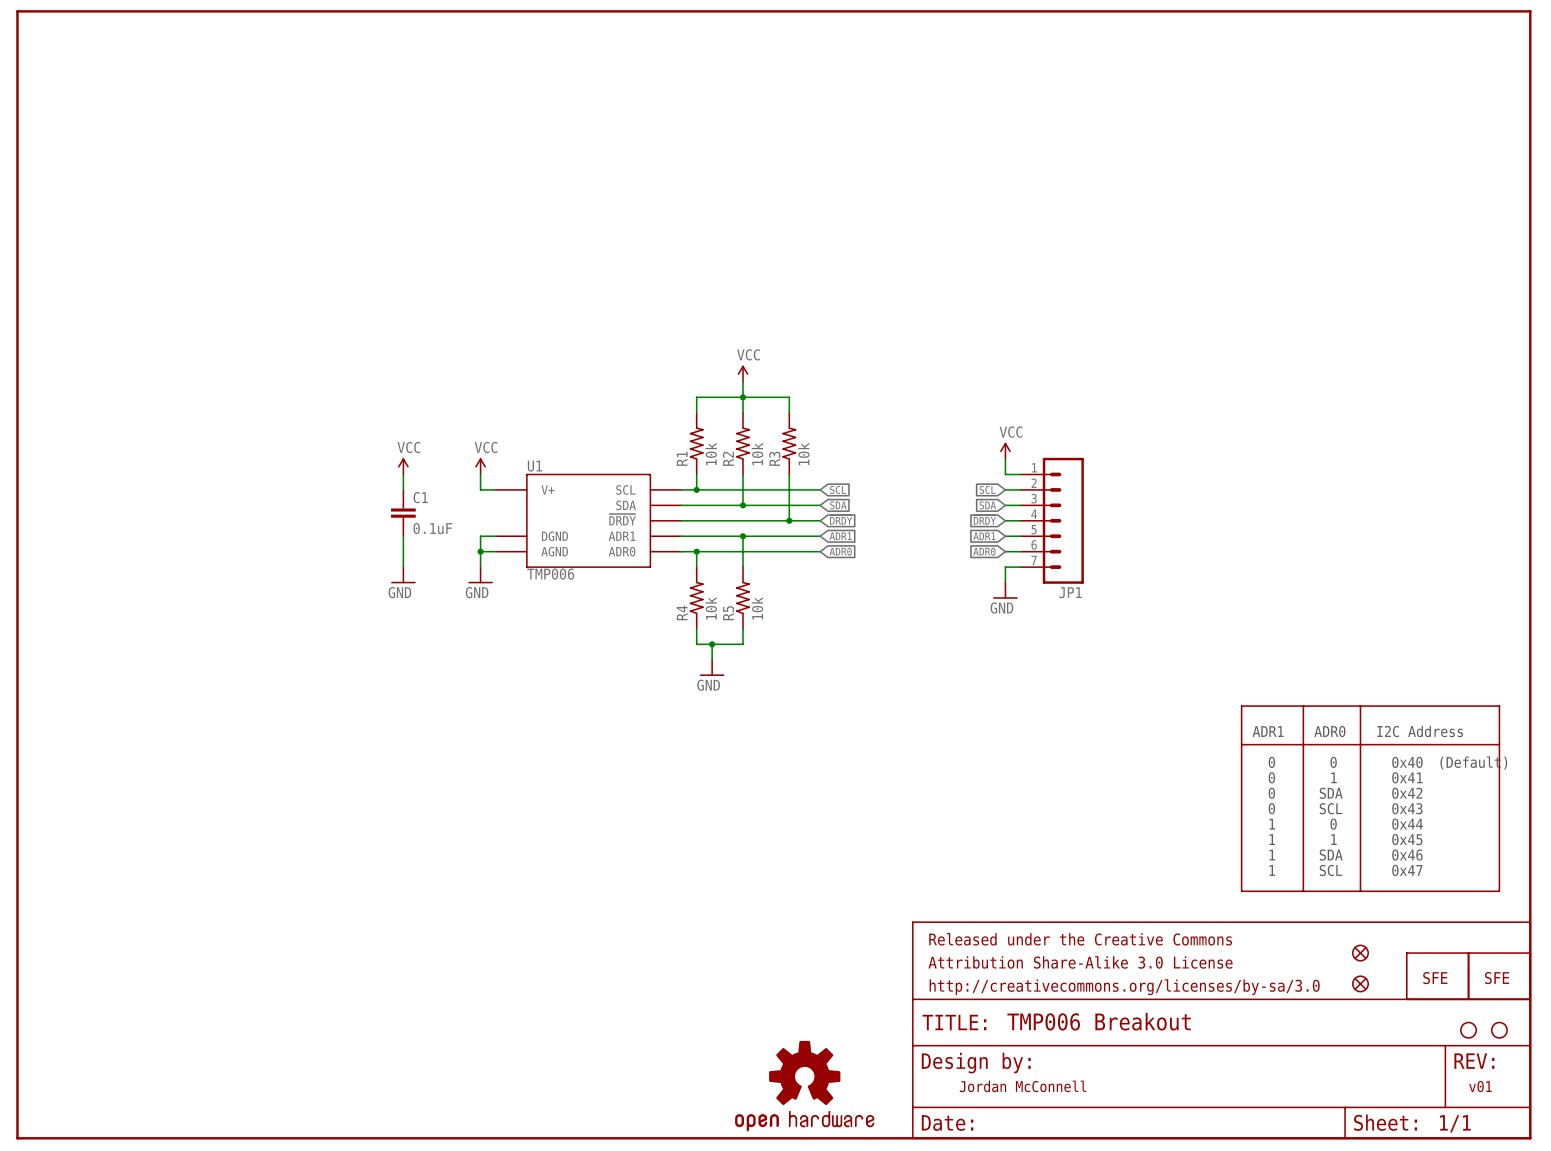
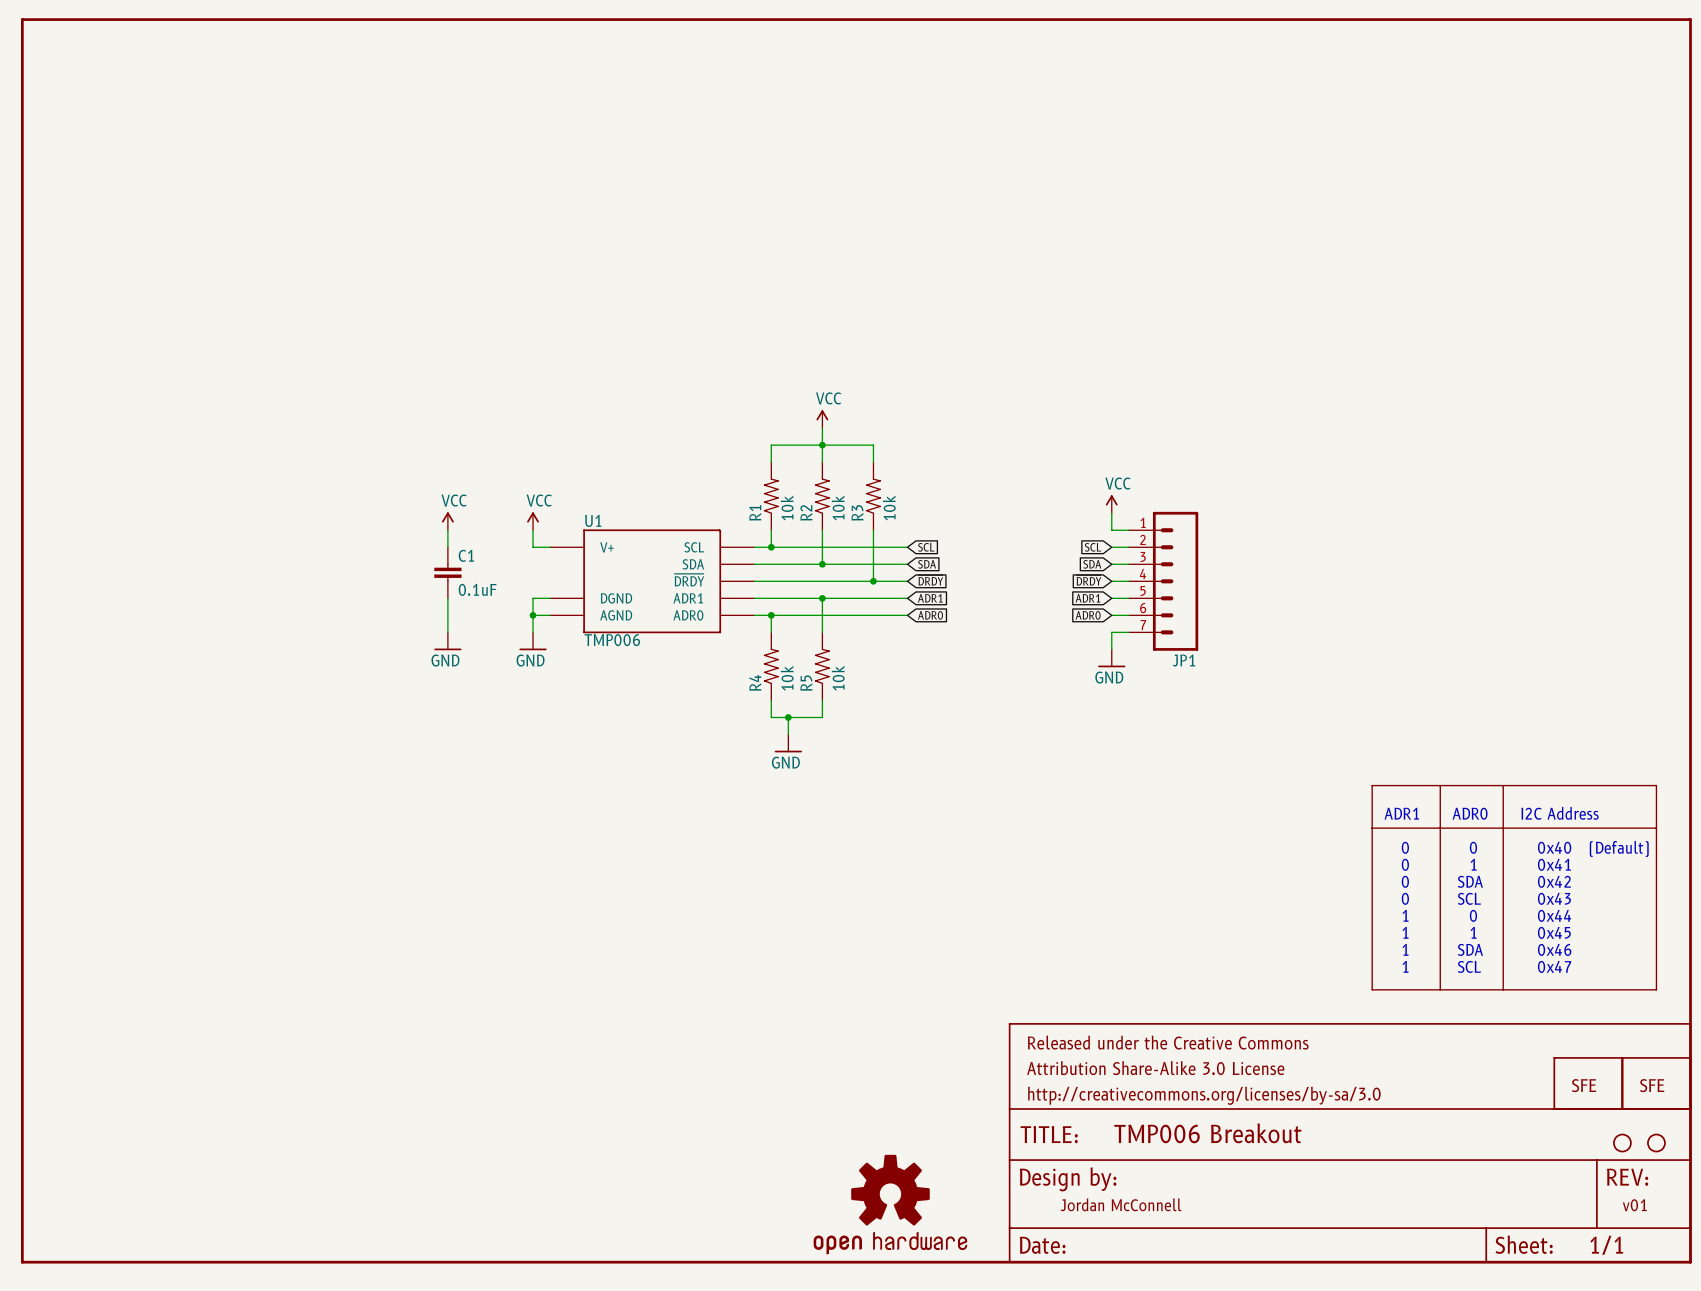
part: (1360, 953) -> none
part: (1360, 983) -> none

